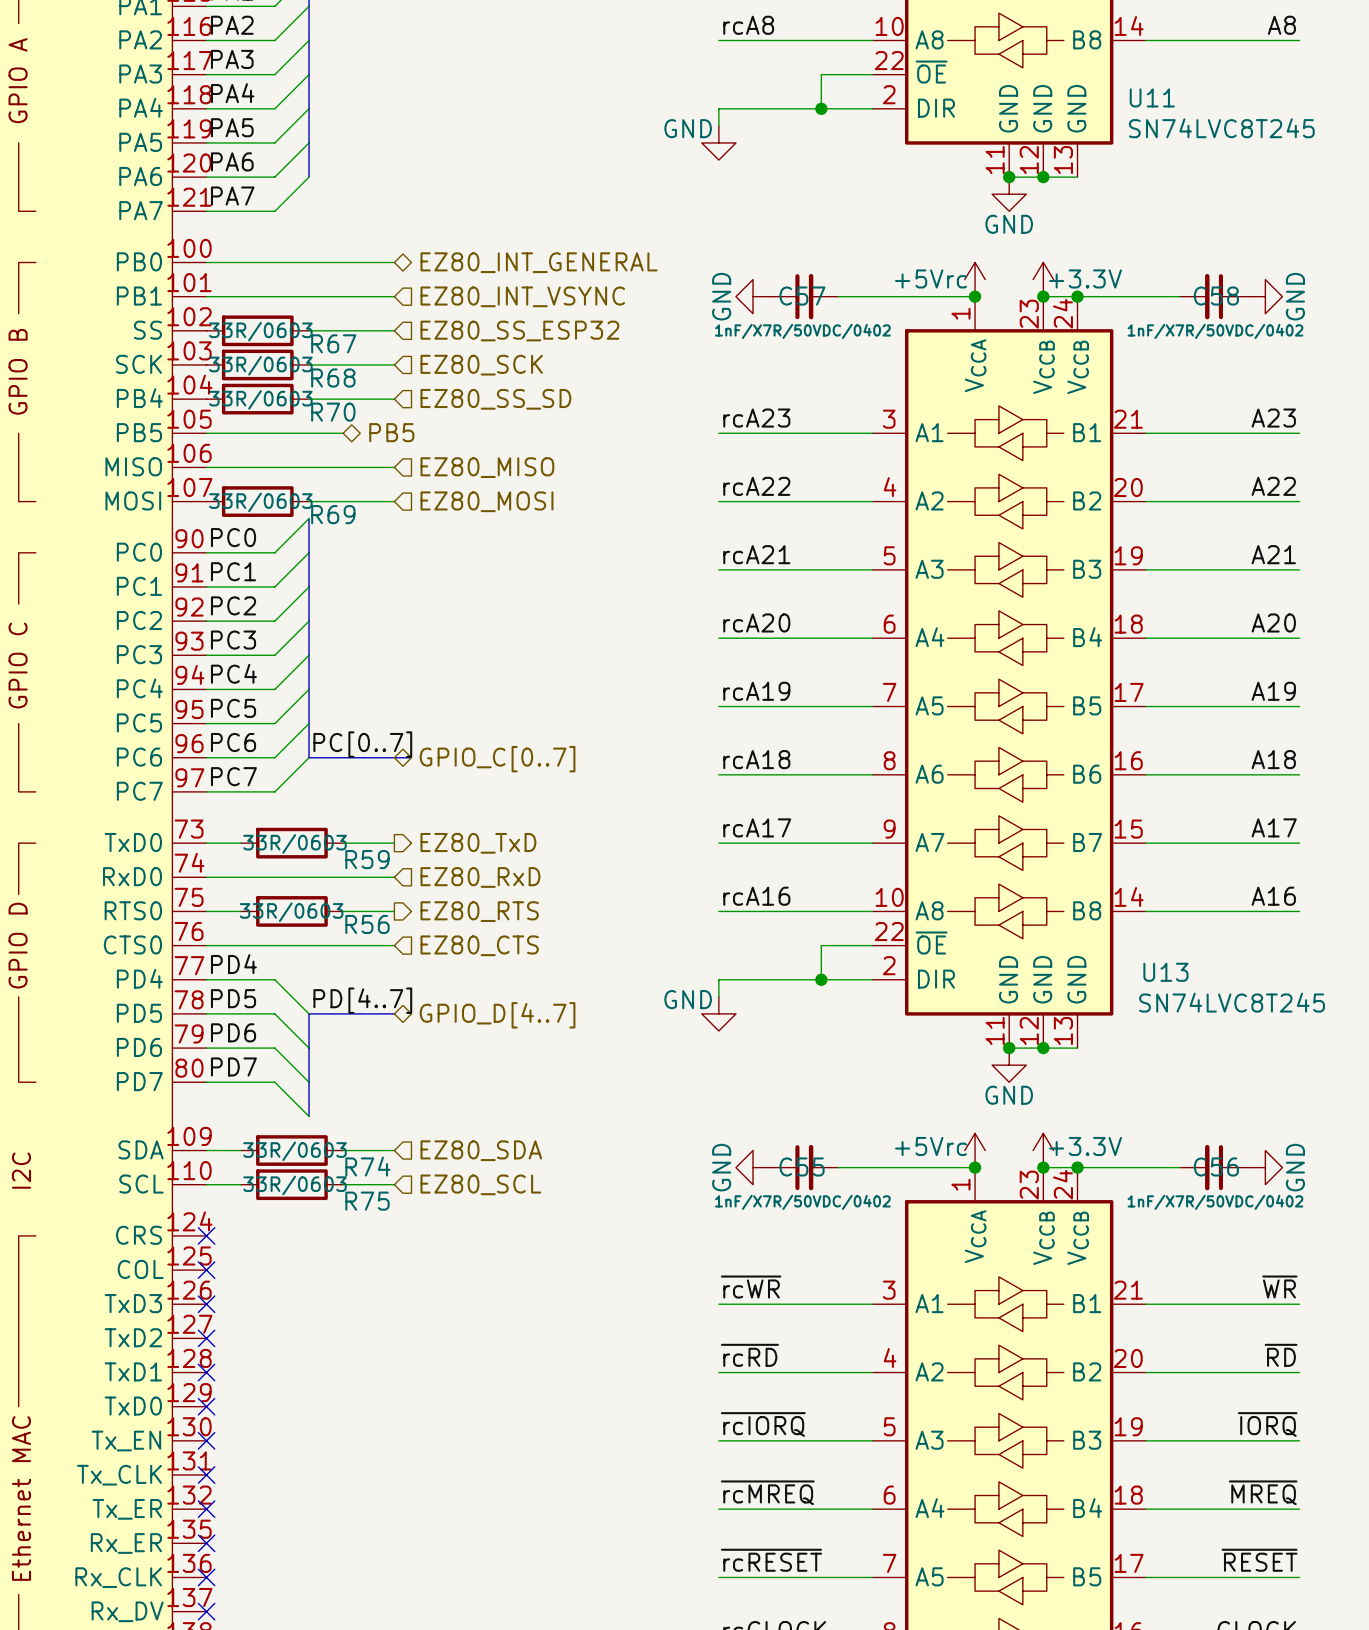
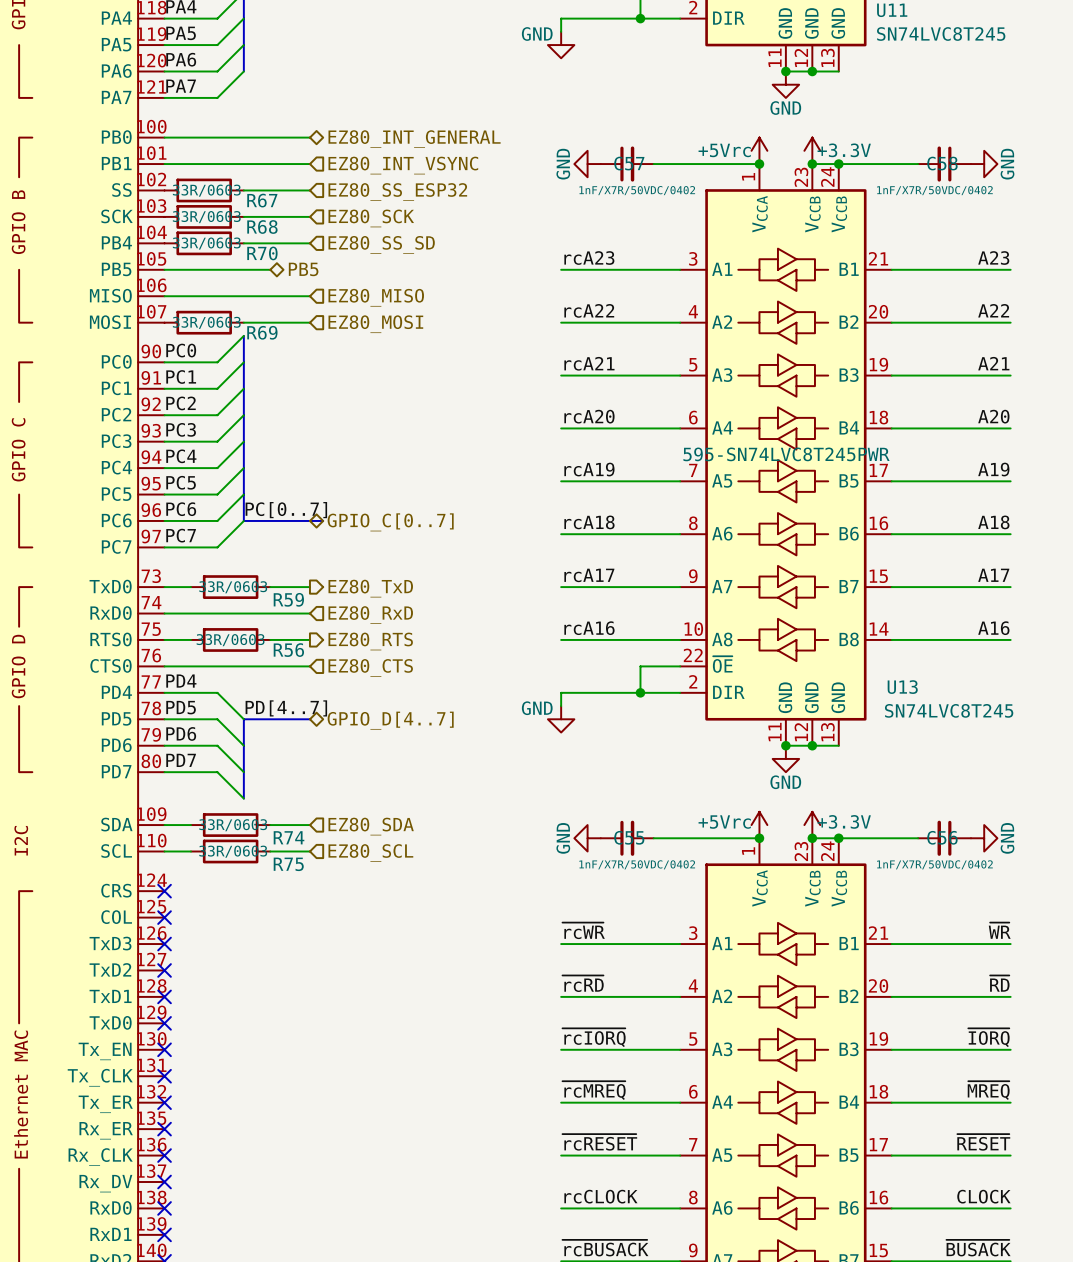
U13 text: none -> 595-SN74LVC8T245PWR (786, 454)

